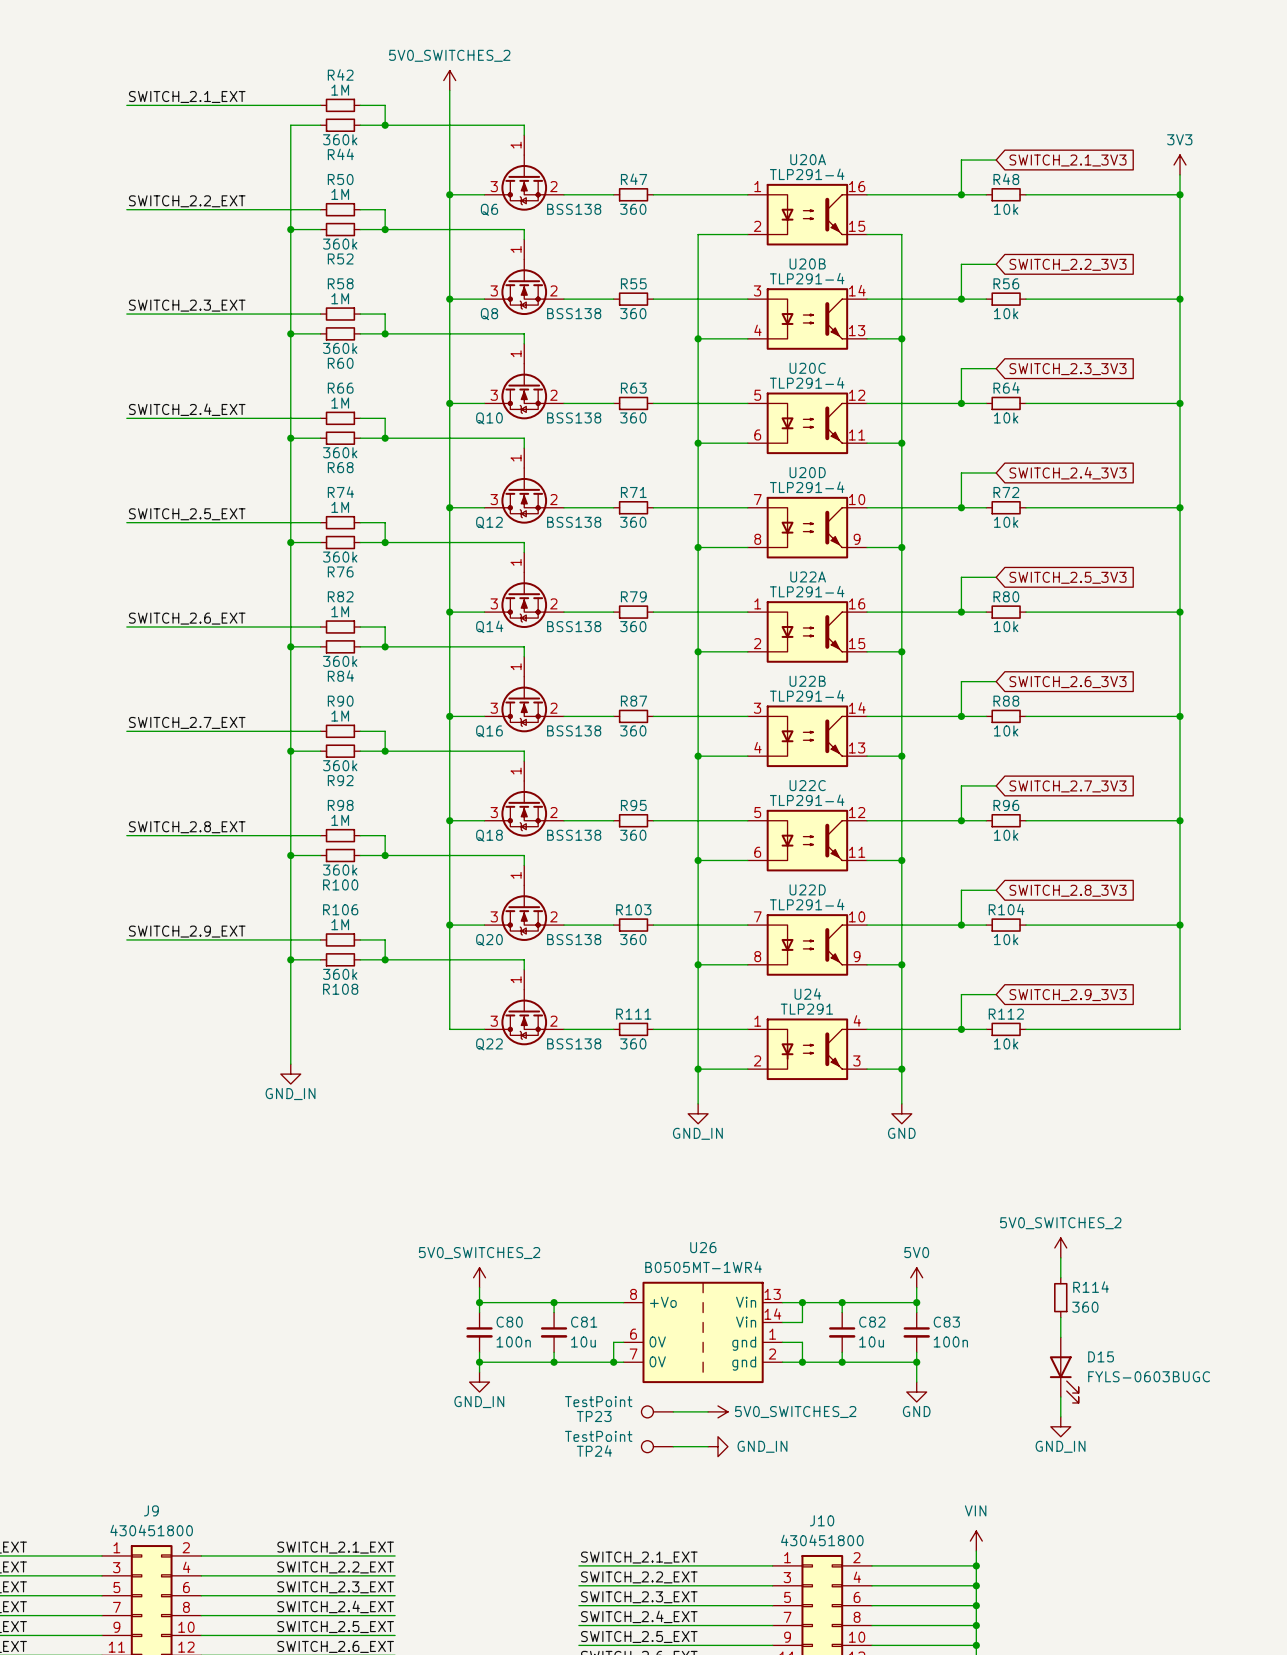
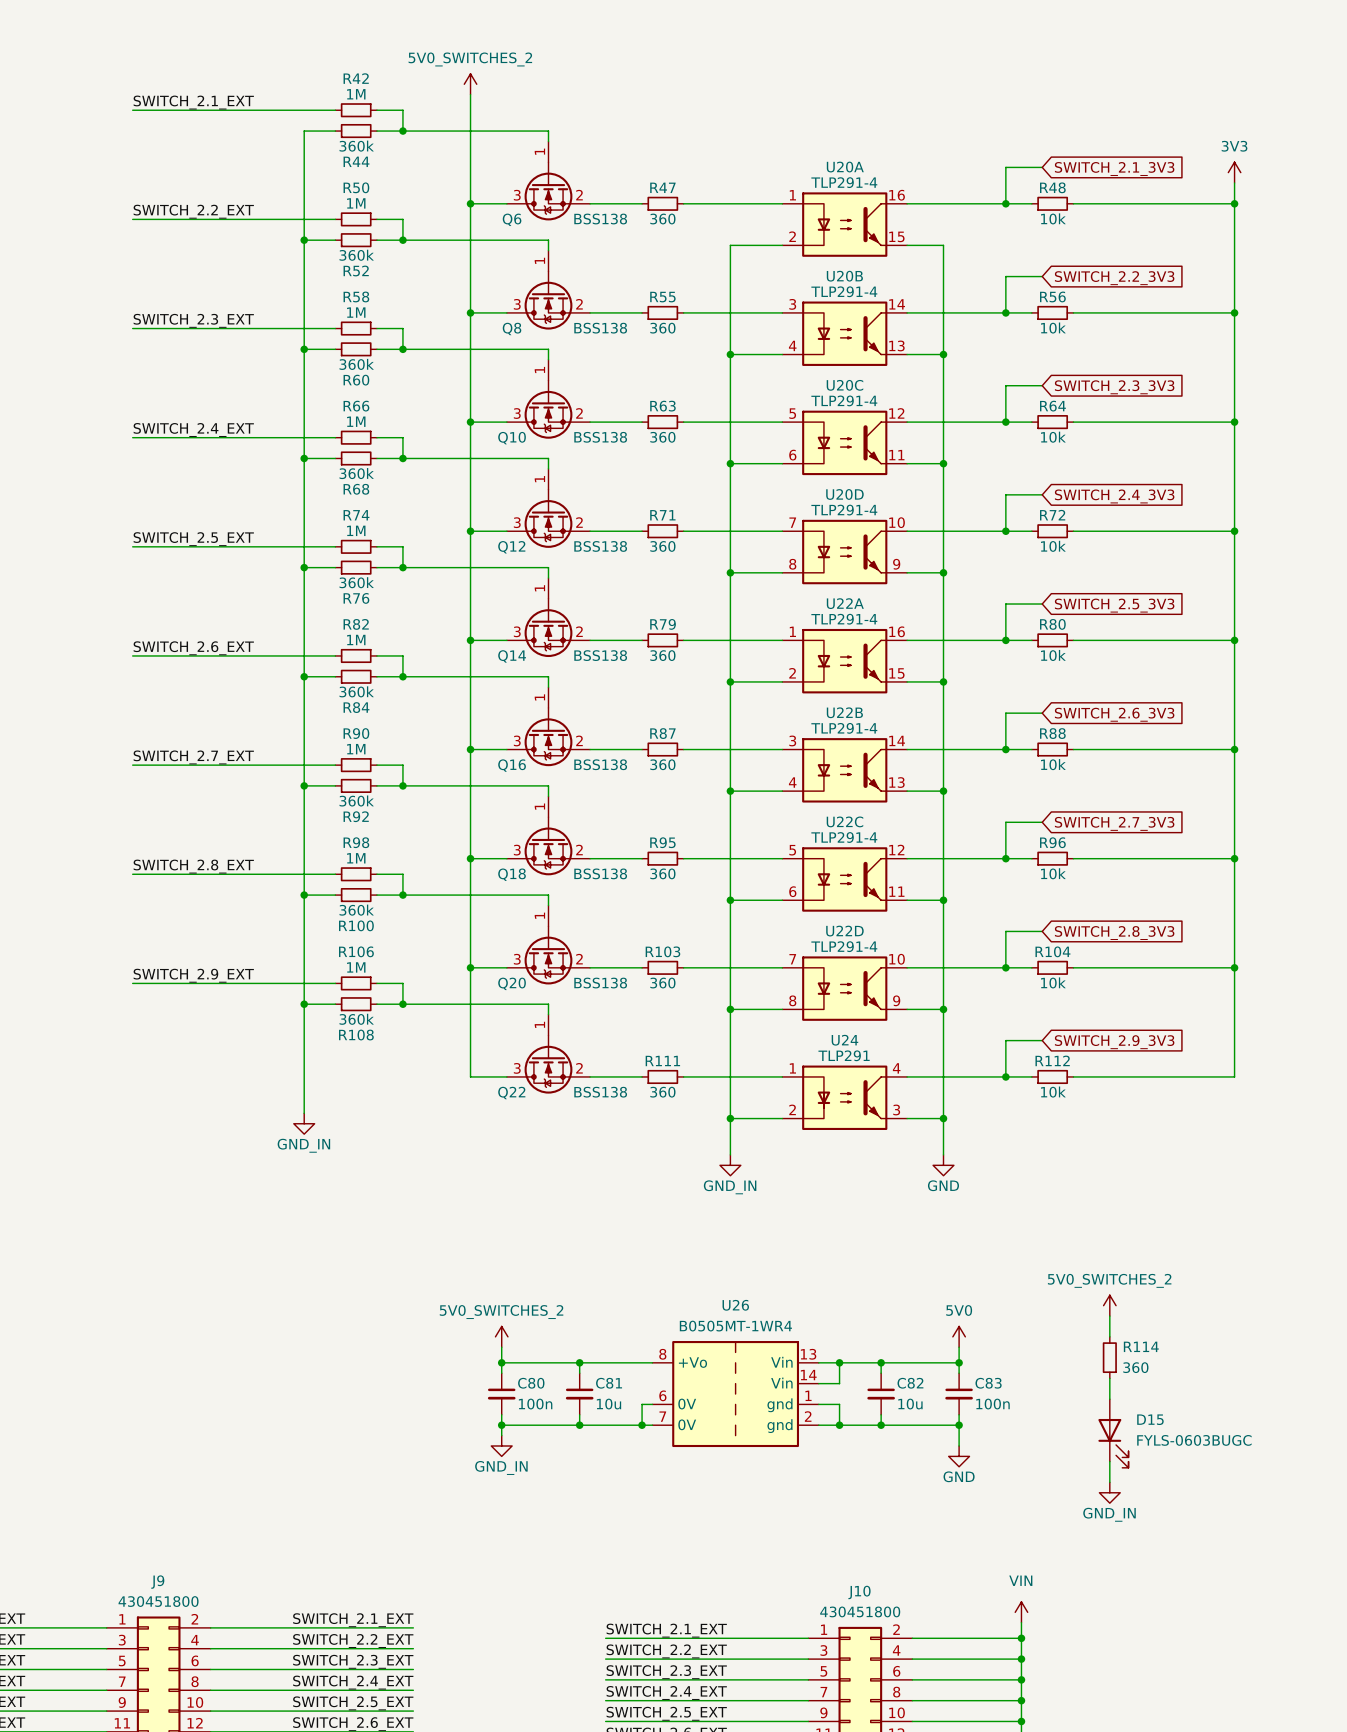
TP23: TestPoint (657, 1411) -> none
wire: (673, 1411) (708, 1411) -> none
power symbol: 5V0_SWITCHES_2 (717, 1411) -> none
TP24: TestPoint (657, 1446) -> none
wire: (673, 1446) (708, 1446) -> none
power symbol: GND_IN (717, 1446) -> none

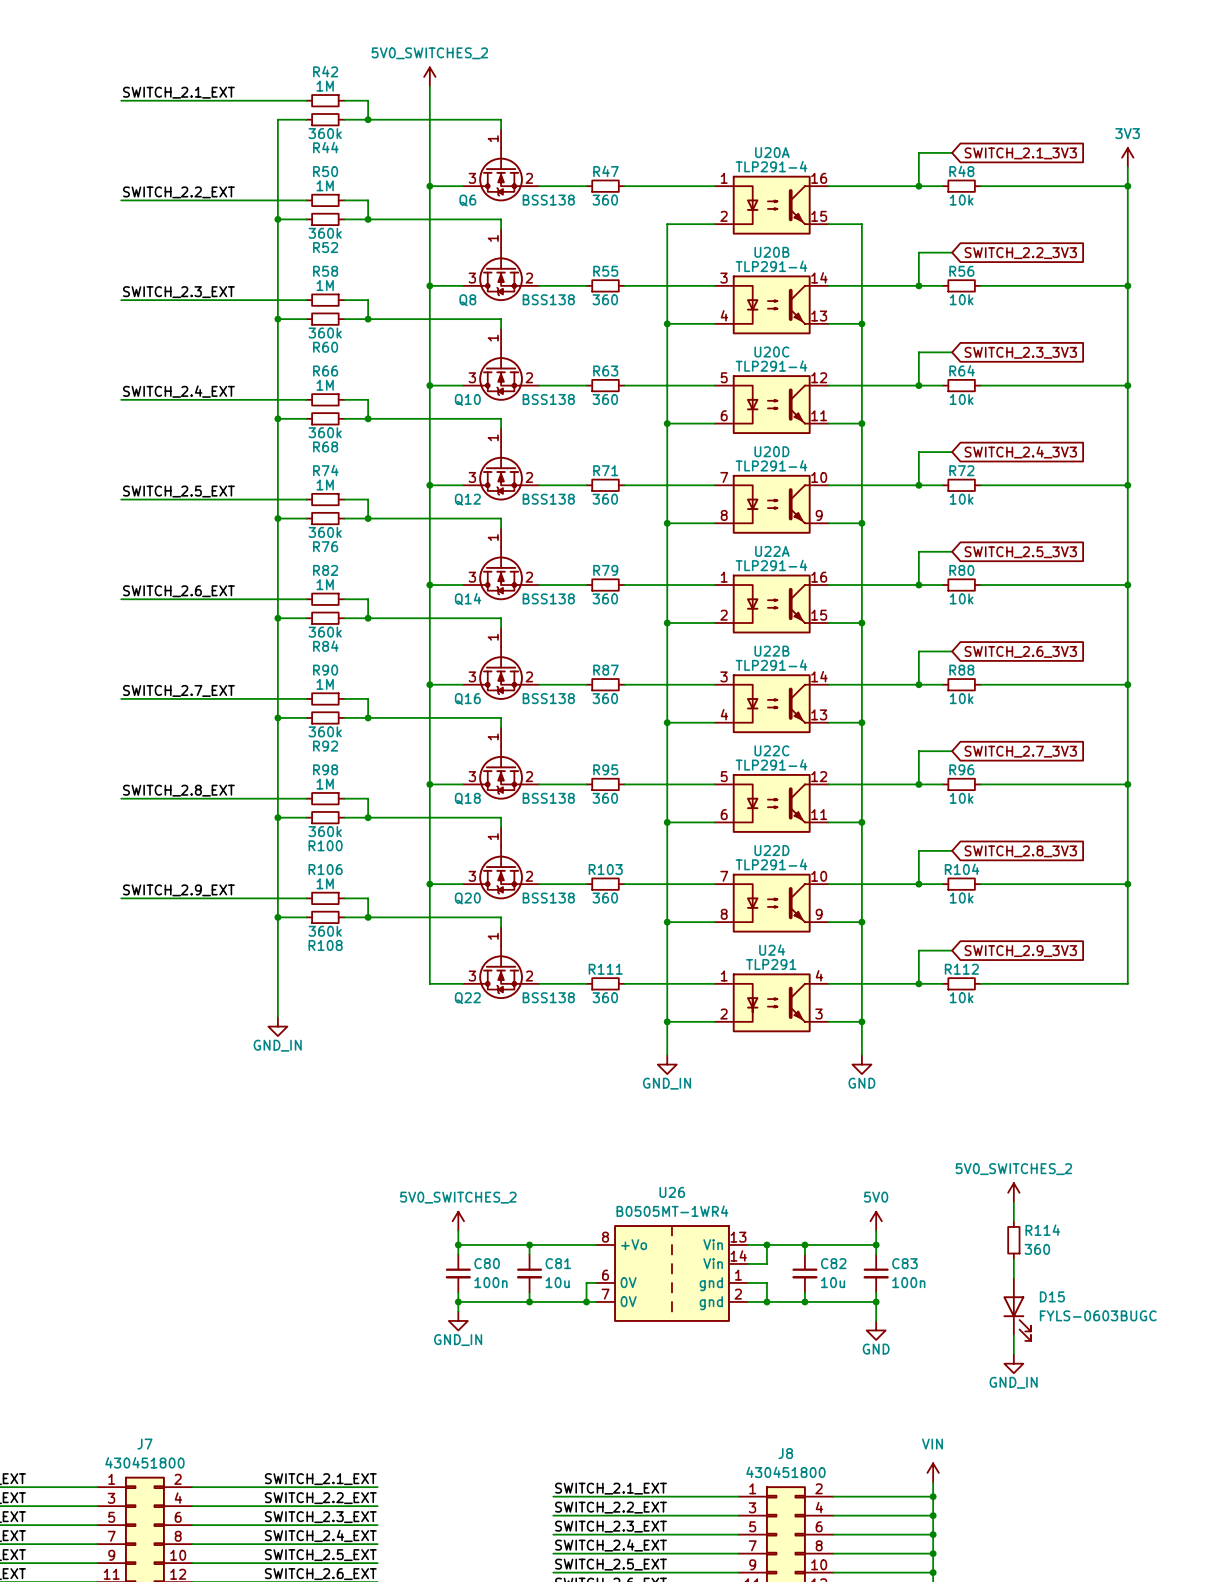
J9 name: J9 (157, 1582) -> J7 (144, 1444)
J10 name: J10 (859, 1592) -> J8 (785, 1453)

